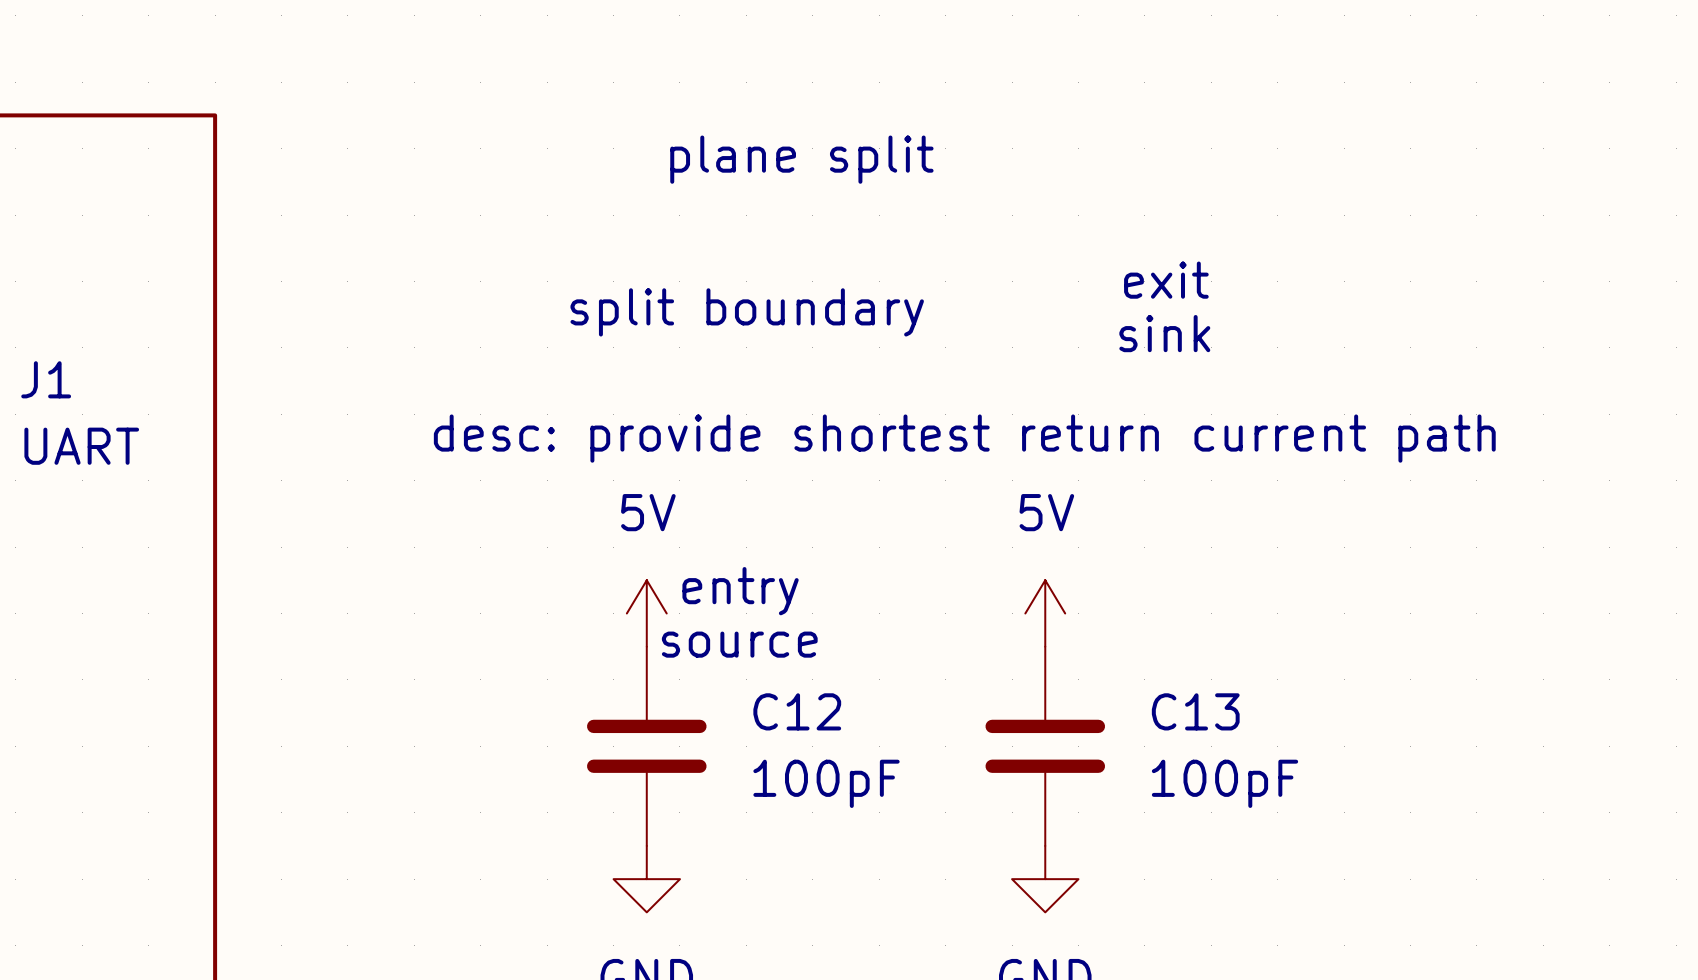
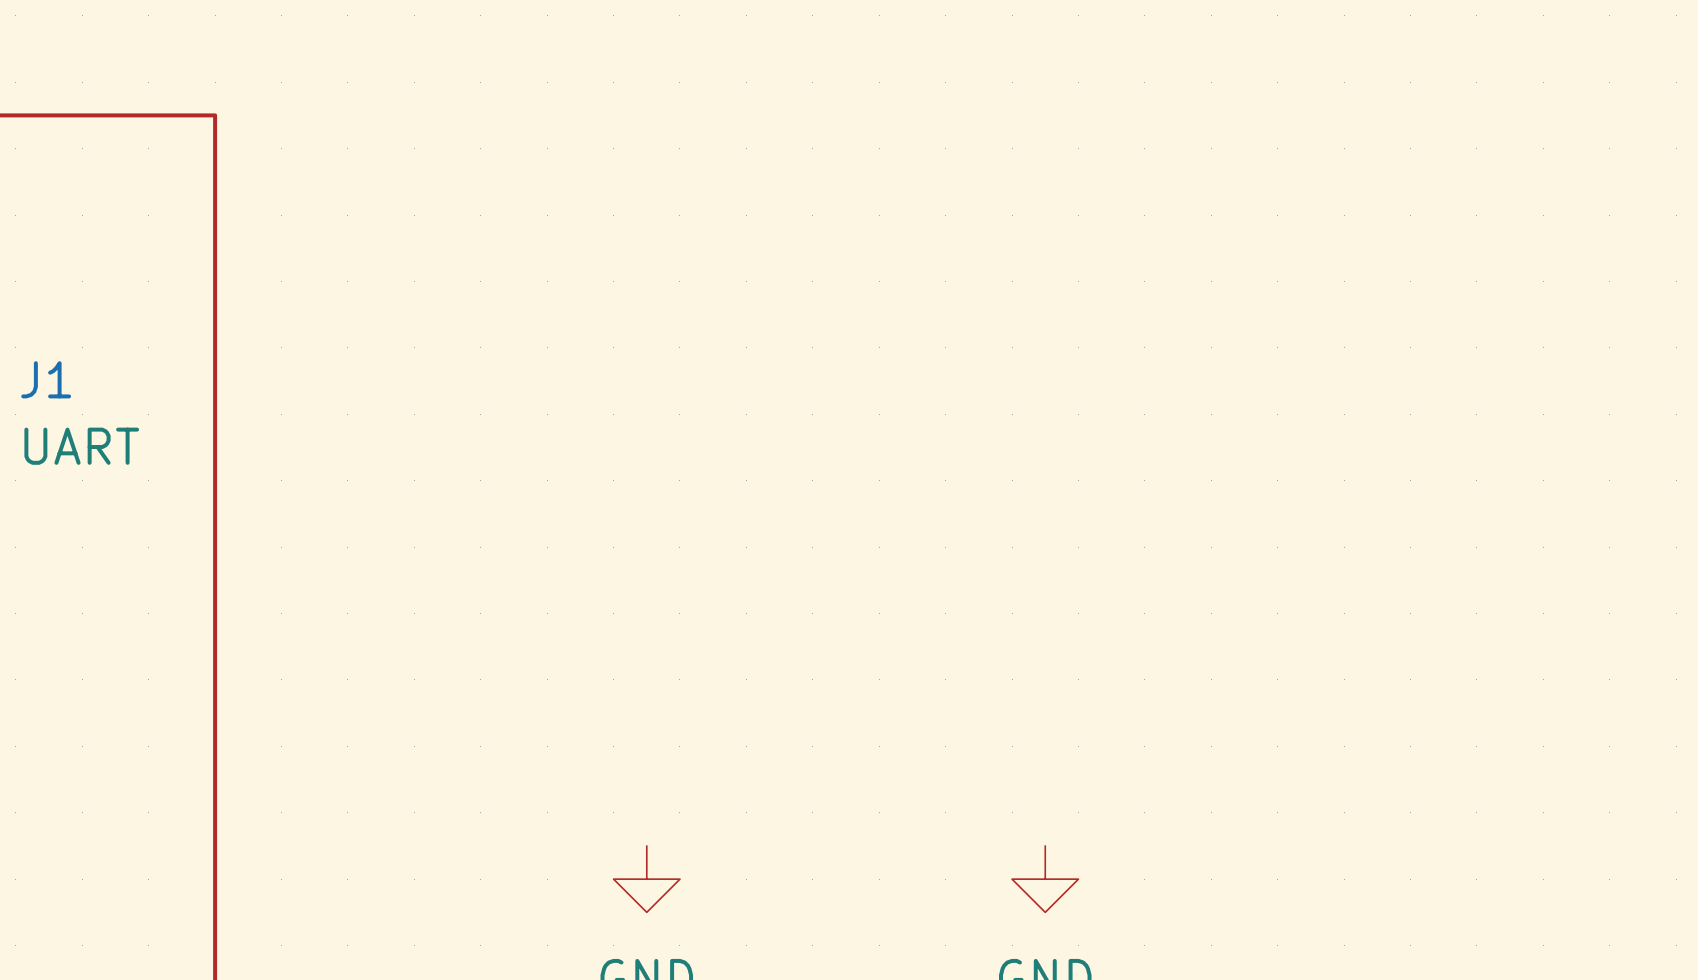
text: plane split (801, 159) -> none
text: exit (1166, 280) -> none
text: split boundary (747, 312) -> none
text: sink (1164, 333) -> none
text: desc: provide shortest return current path (964, 438) -> none
text: entry (740, 591) -> none
power symbol: 5V (646, 613) -> none
power symbol: 5V (1045, 613) -> none
text: source (739, 644) -> none
C12: 100pF (646, 746) -> none
C13: 100pF (1045, 746) -> none

